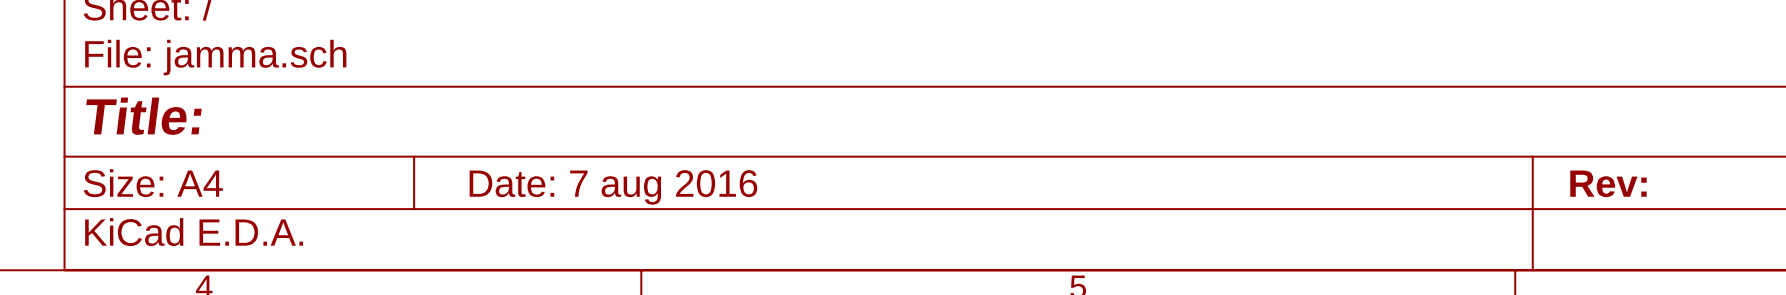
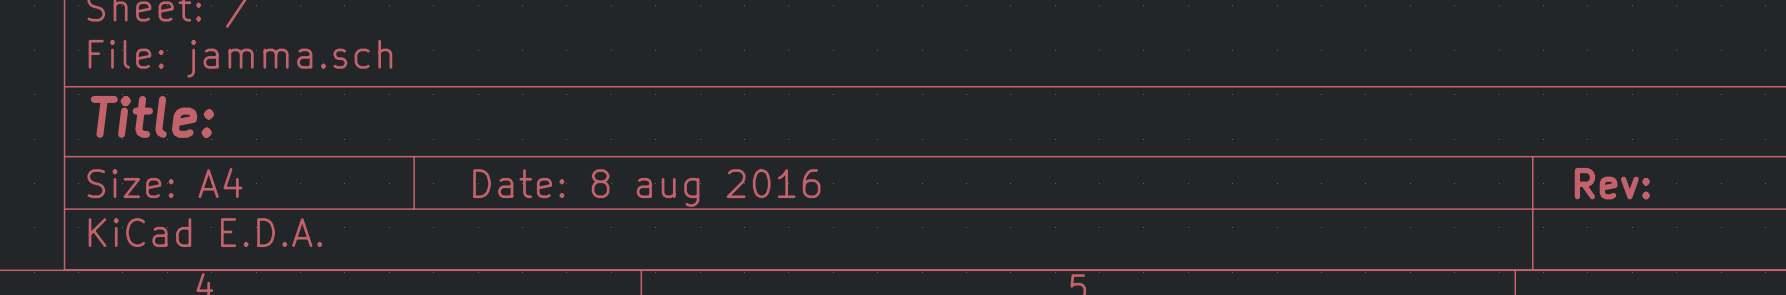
title block: Date: 7 aug 2016 (613, 187) -> Date: 8 aug 2016 (646, 188)

